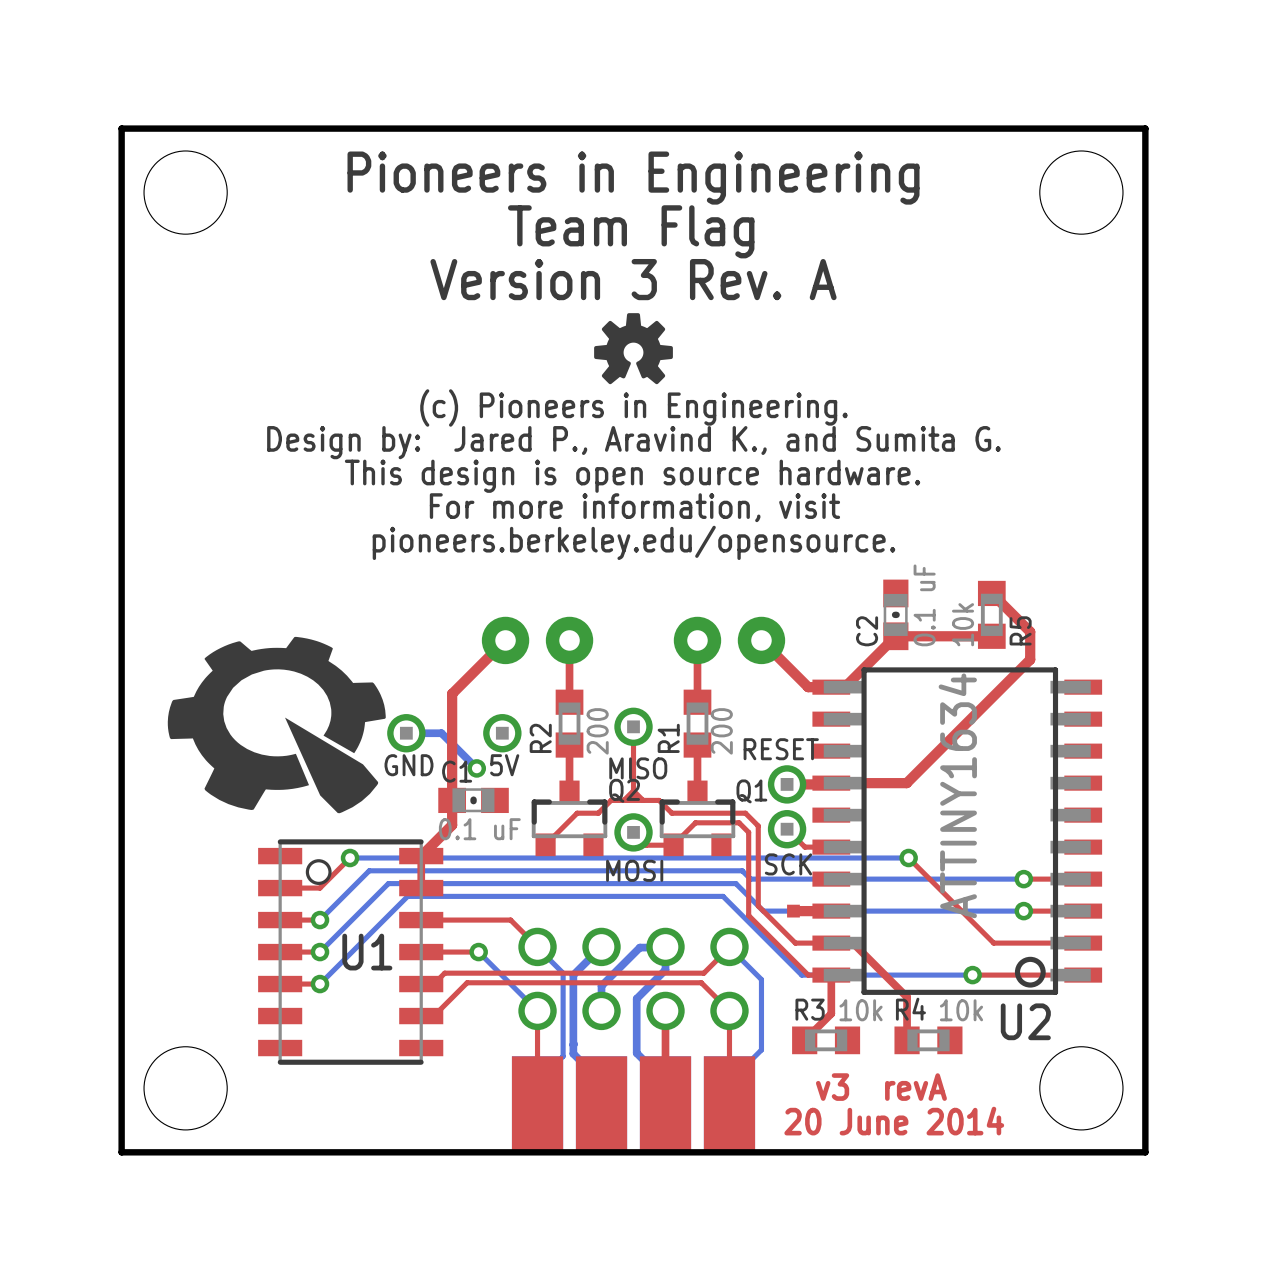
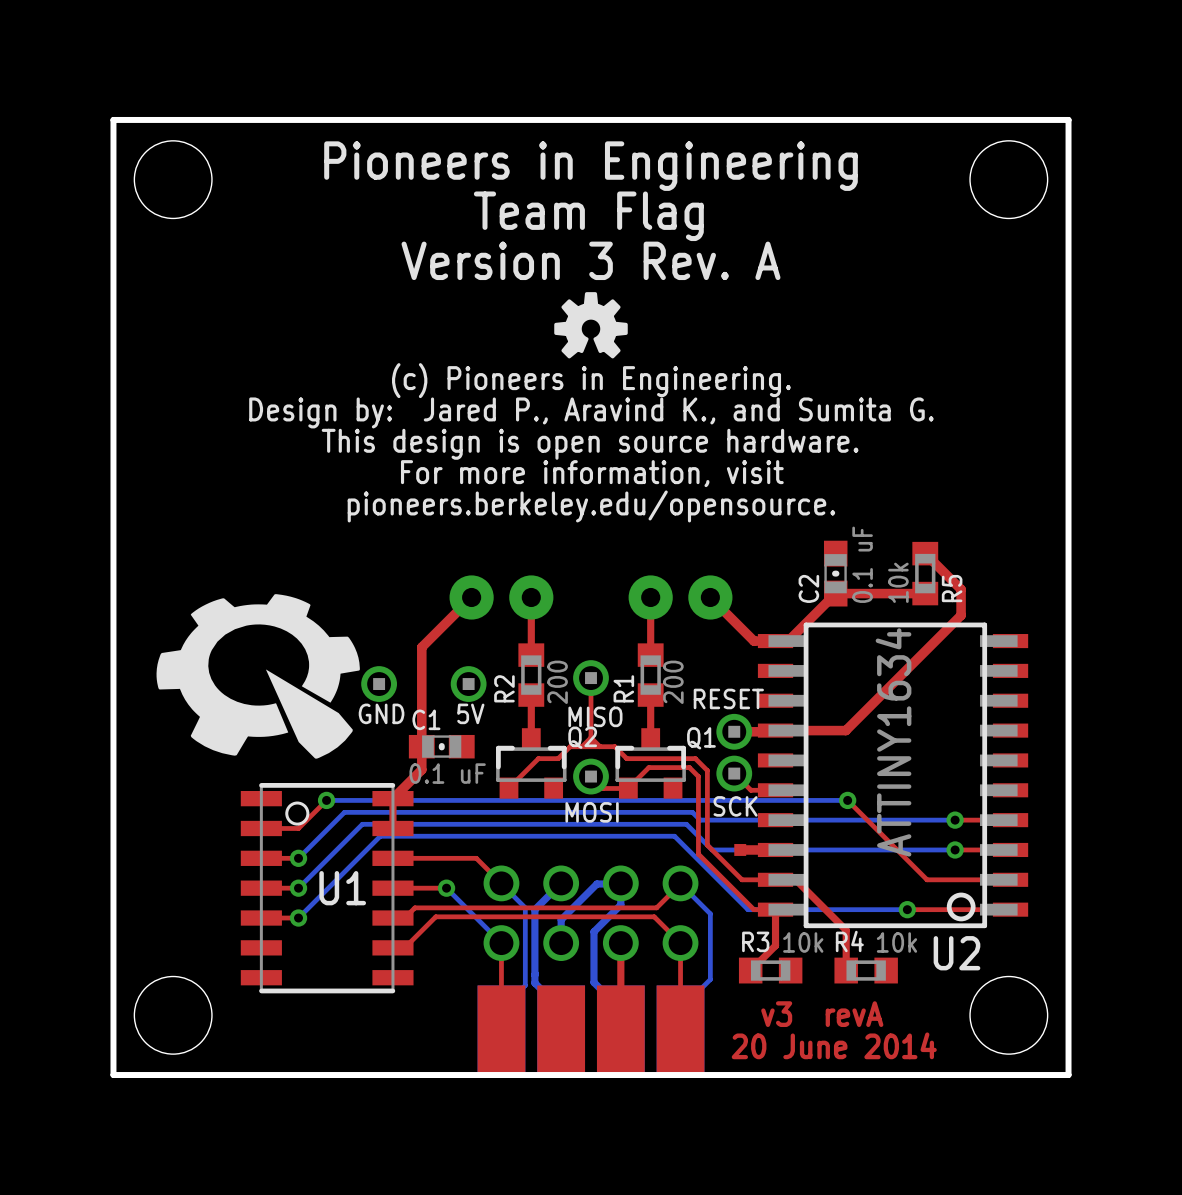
bottom track: (406, 733) (441, 733) (476, 768) -> none
via: (476, 768) -> none

